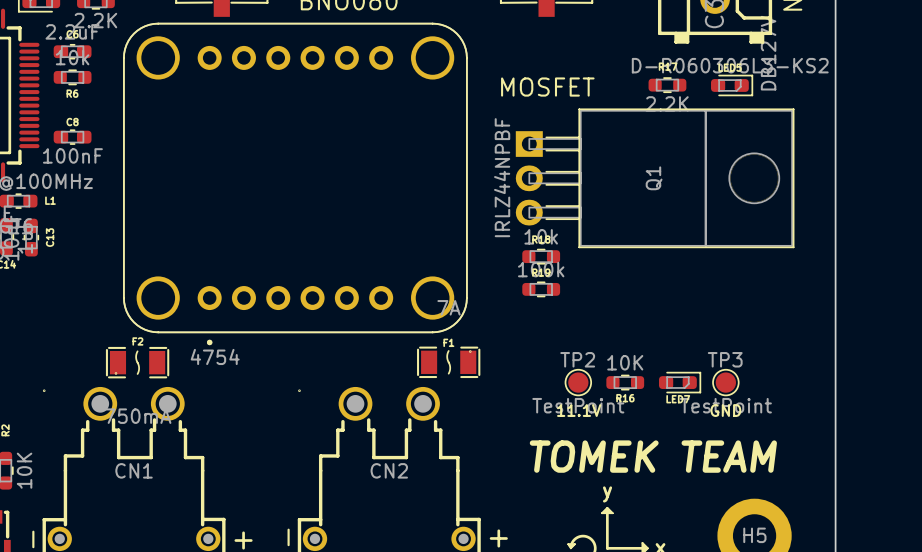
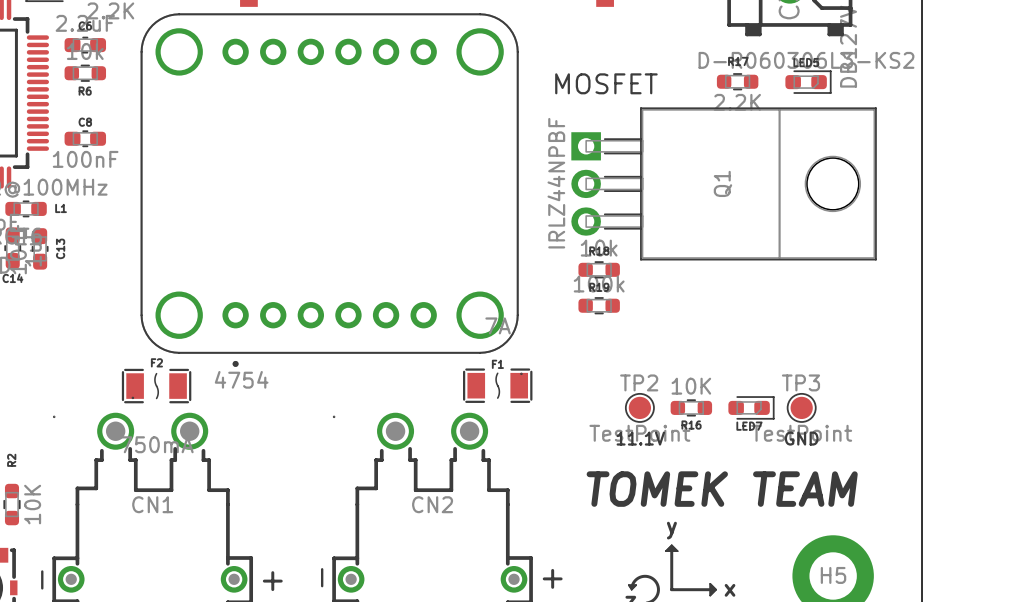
Q1 footprint: [515, 108, 795, 249] -> [571, 107, 877, 261]

